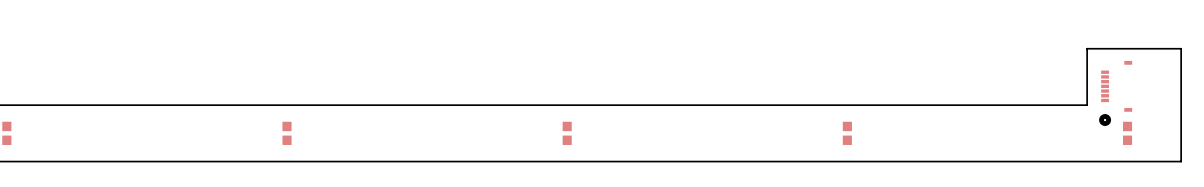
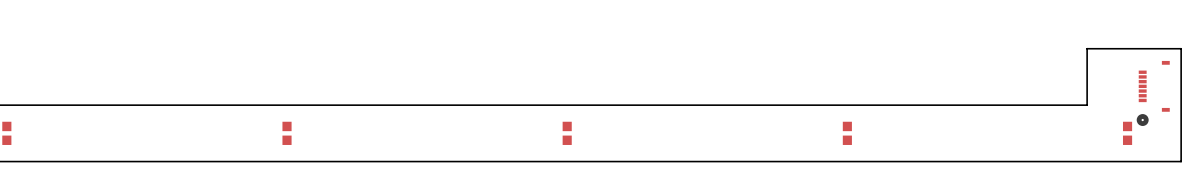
part position: (1115, 93) -> (1153, 93)

